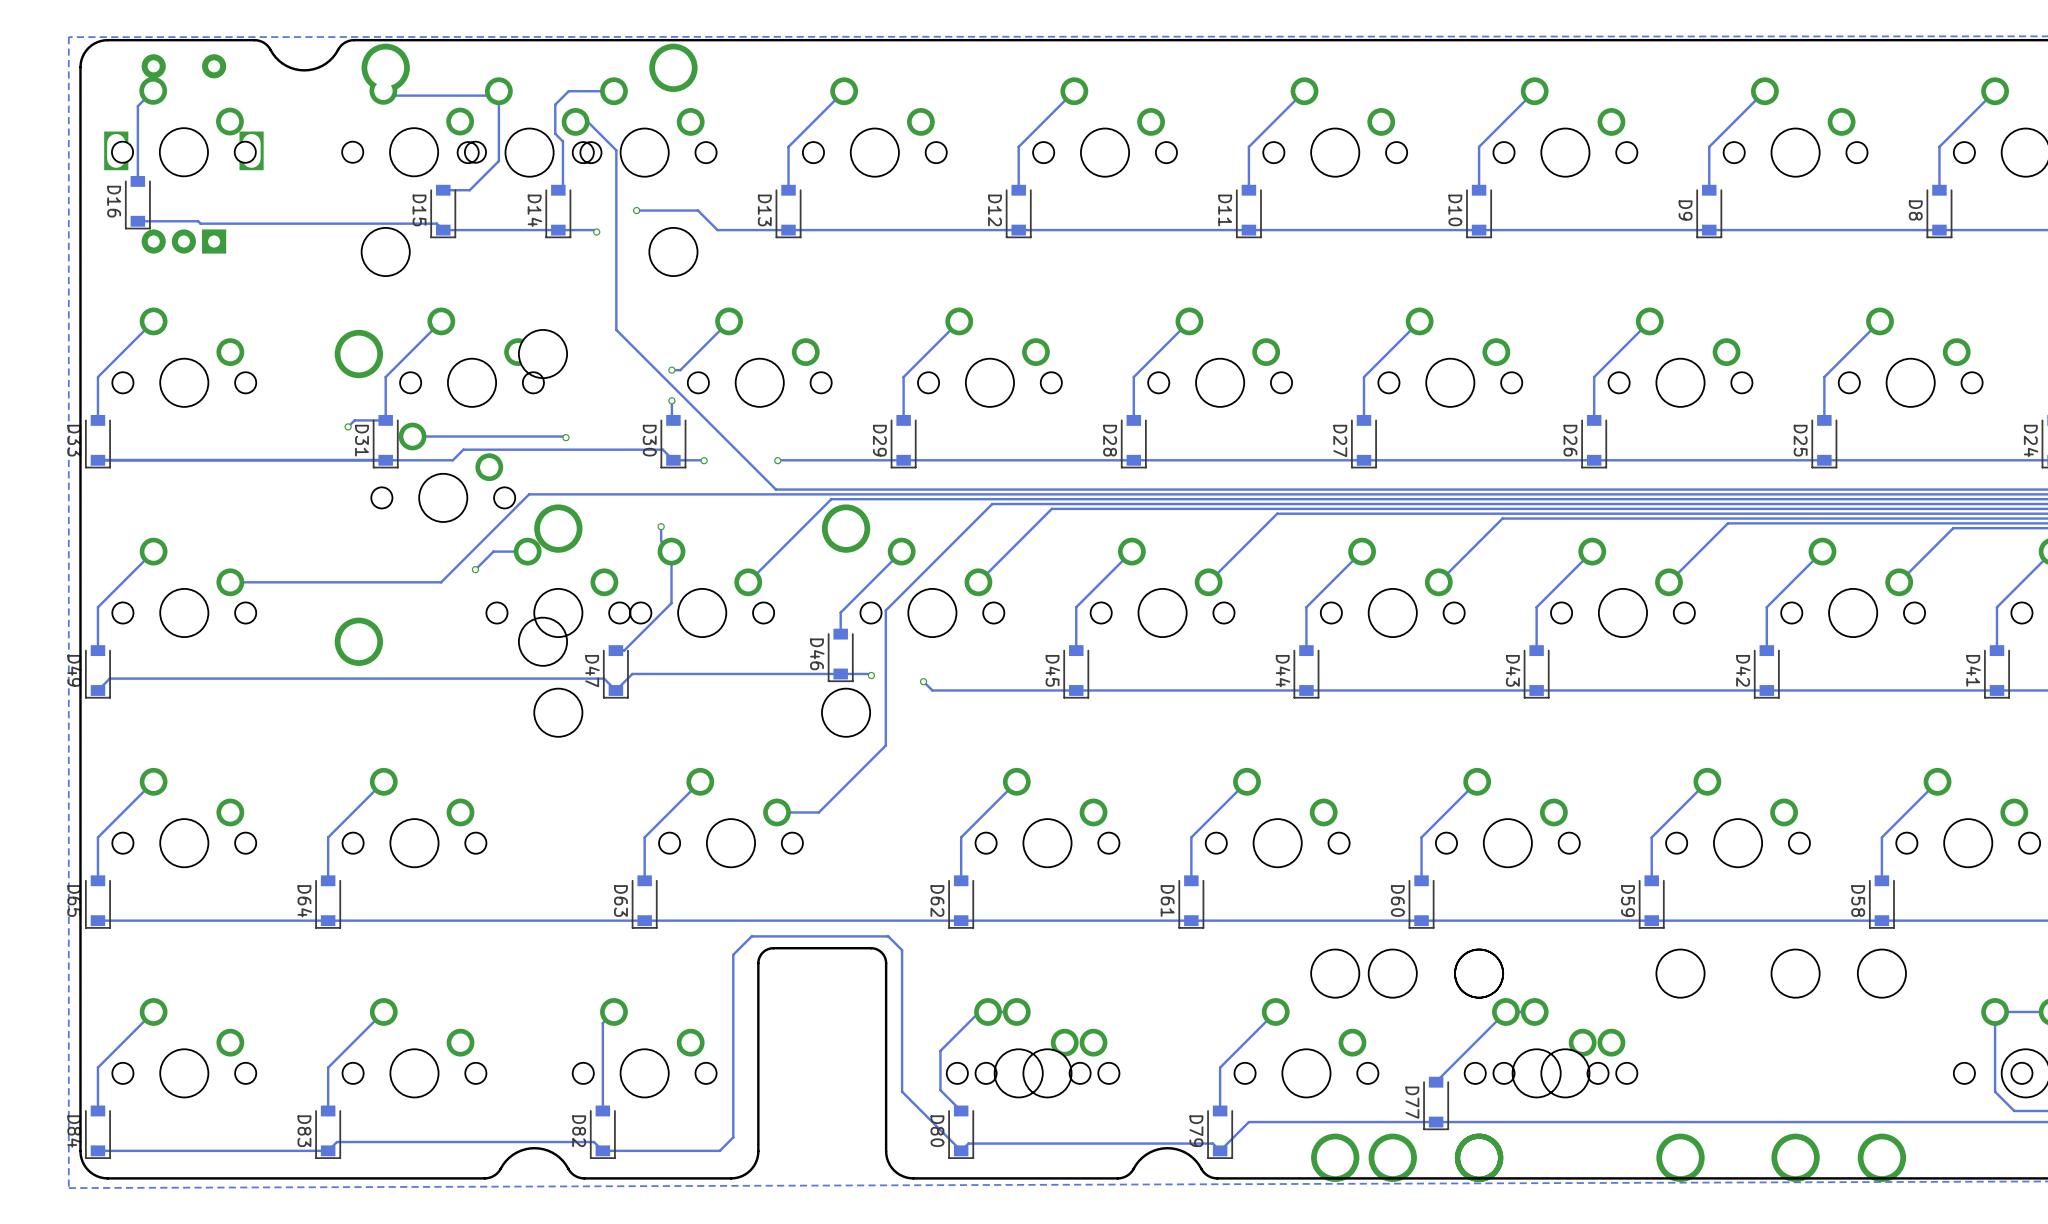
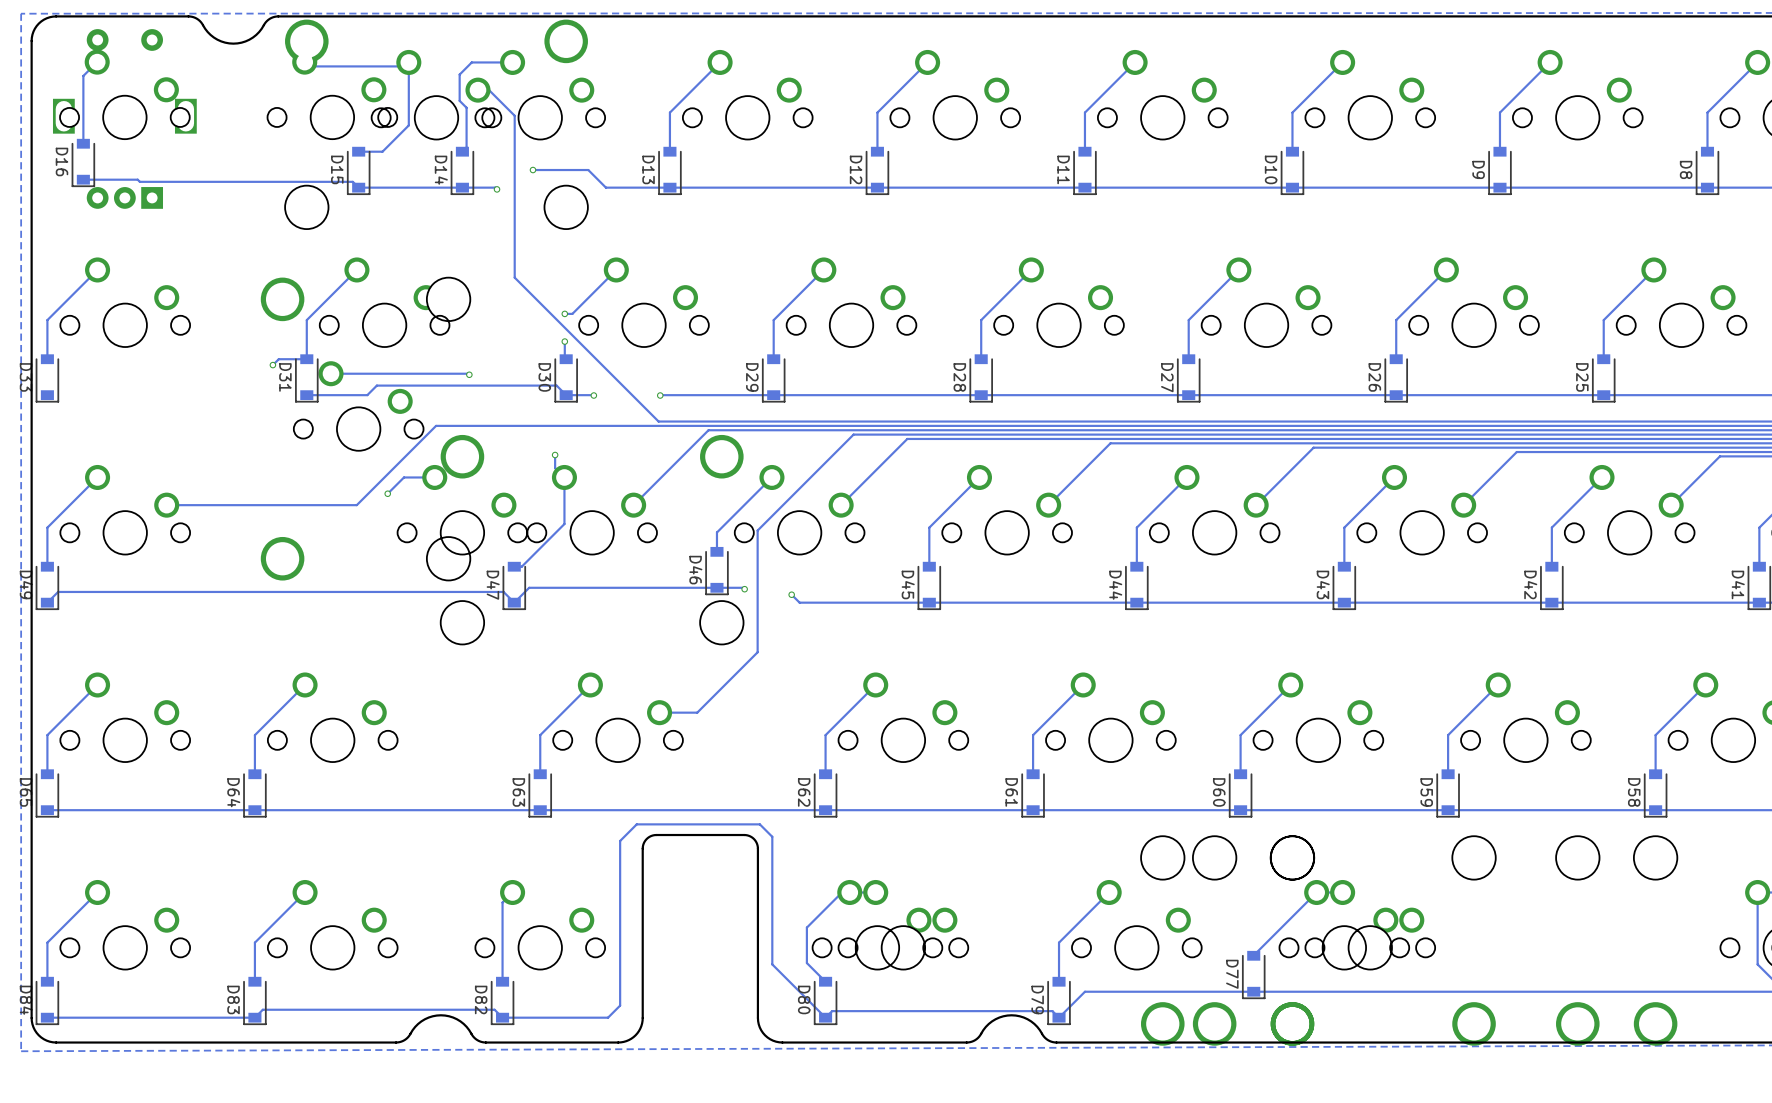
track: (385, 460) (97, 460) -> none

